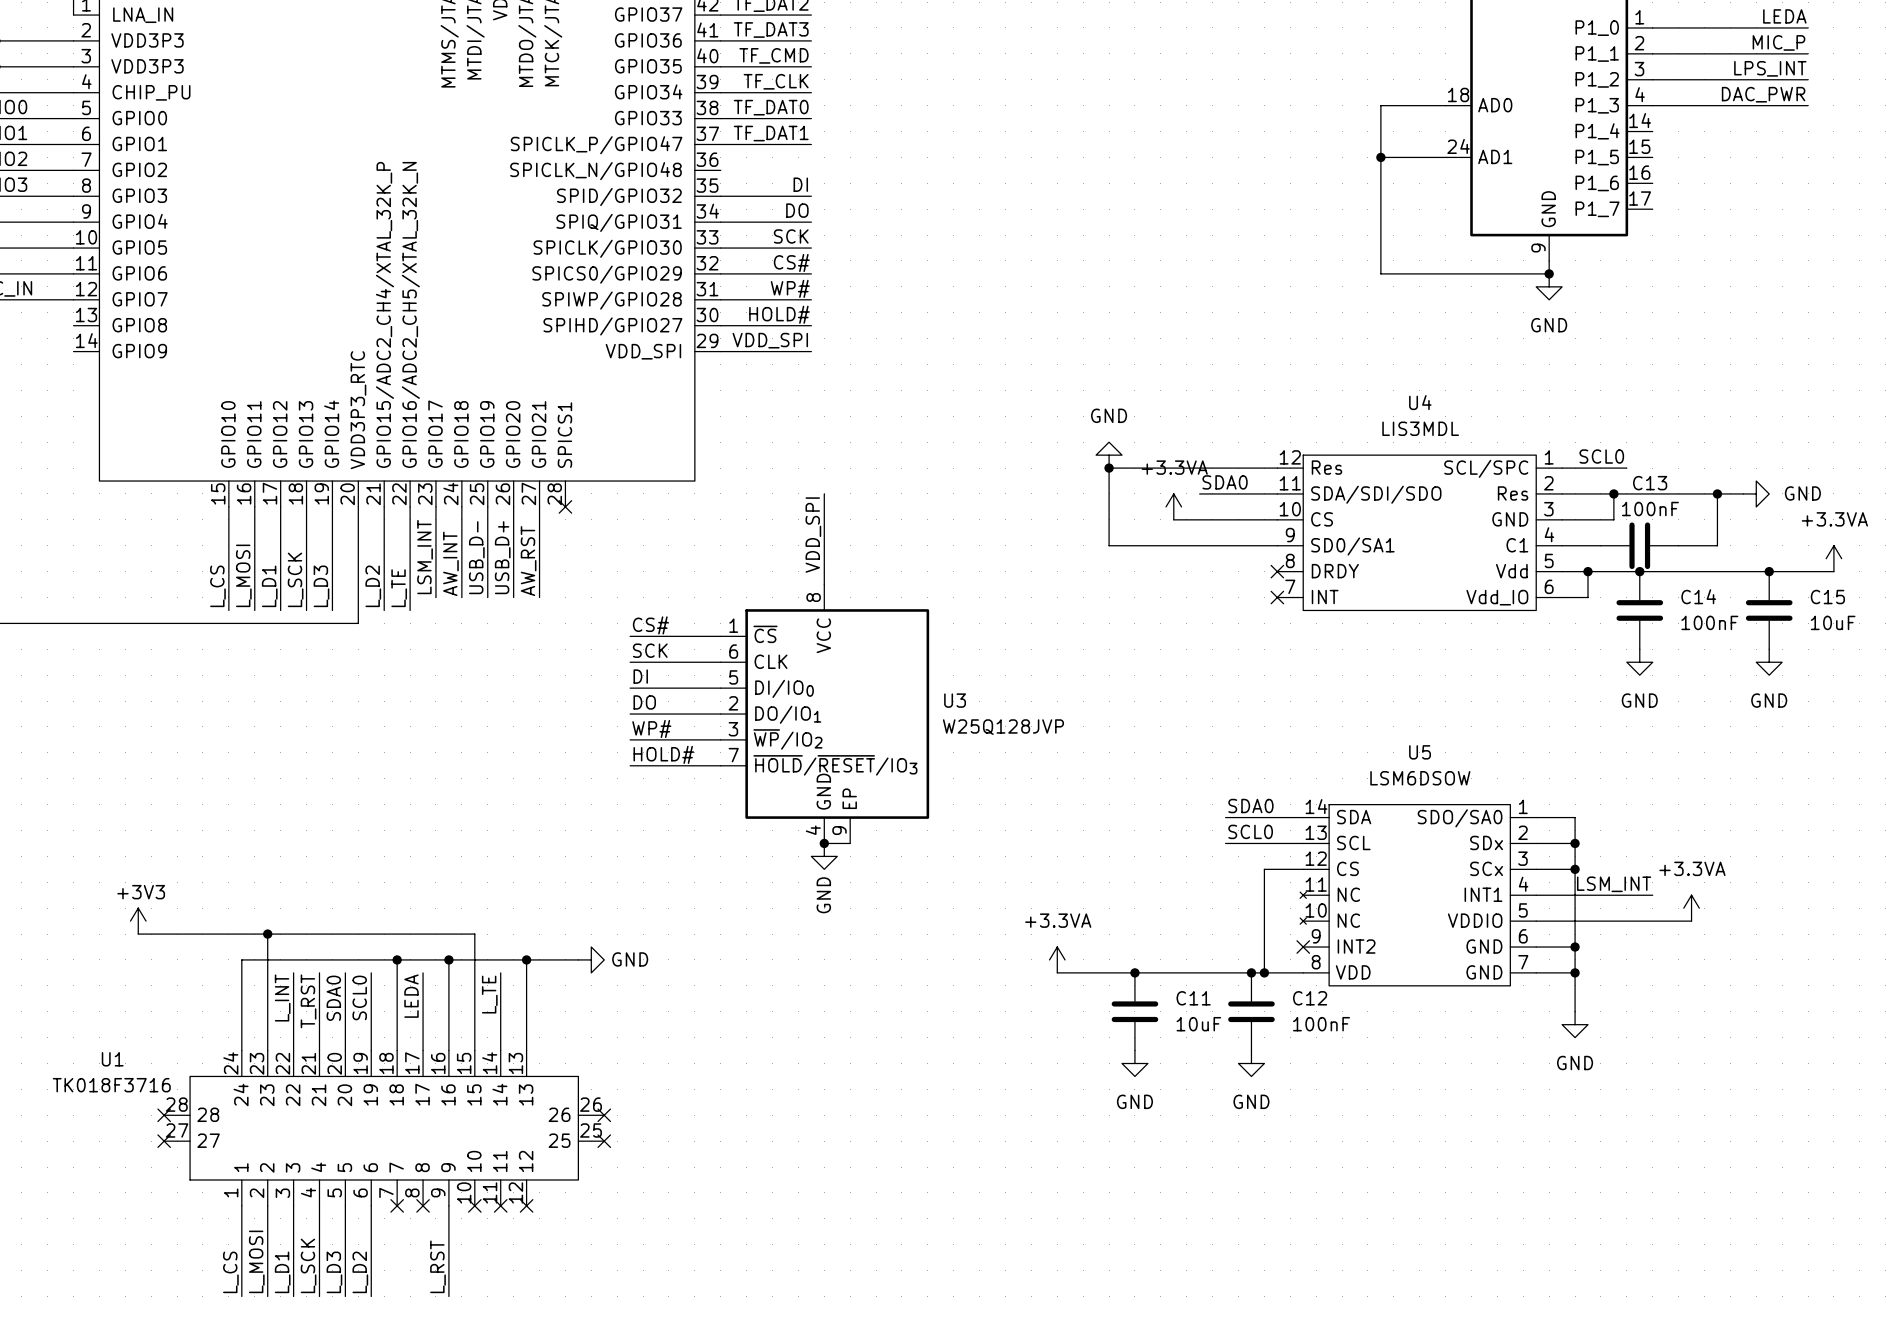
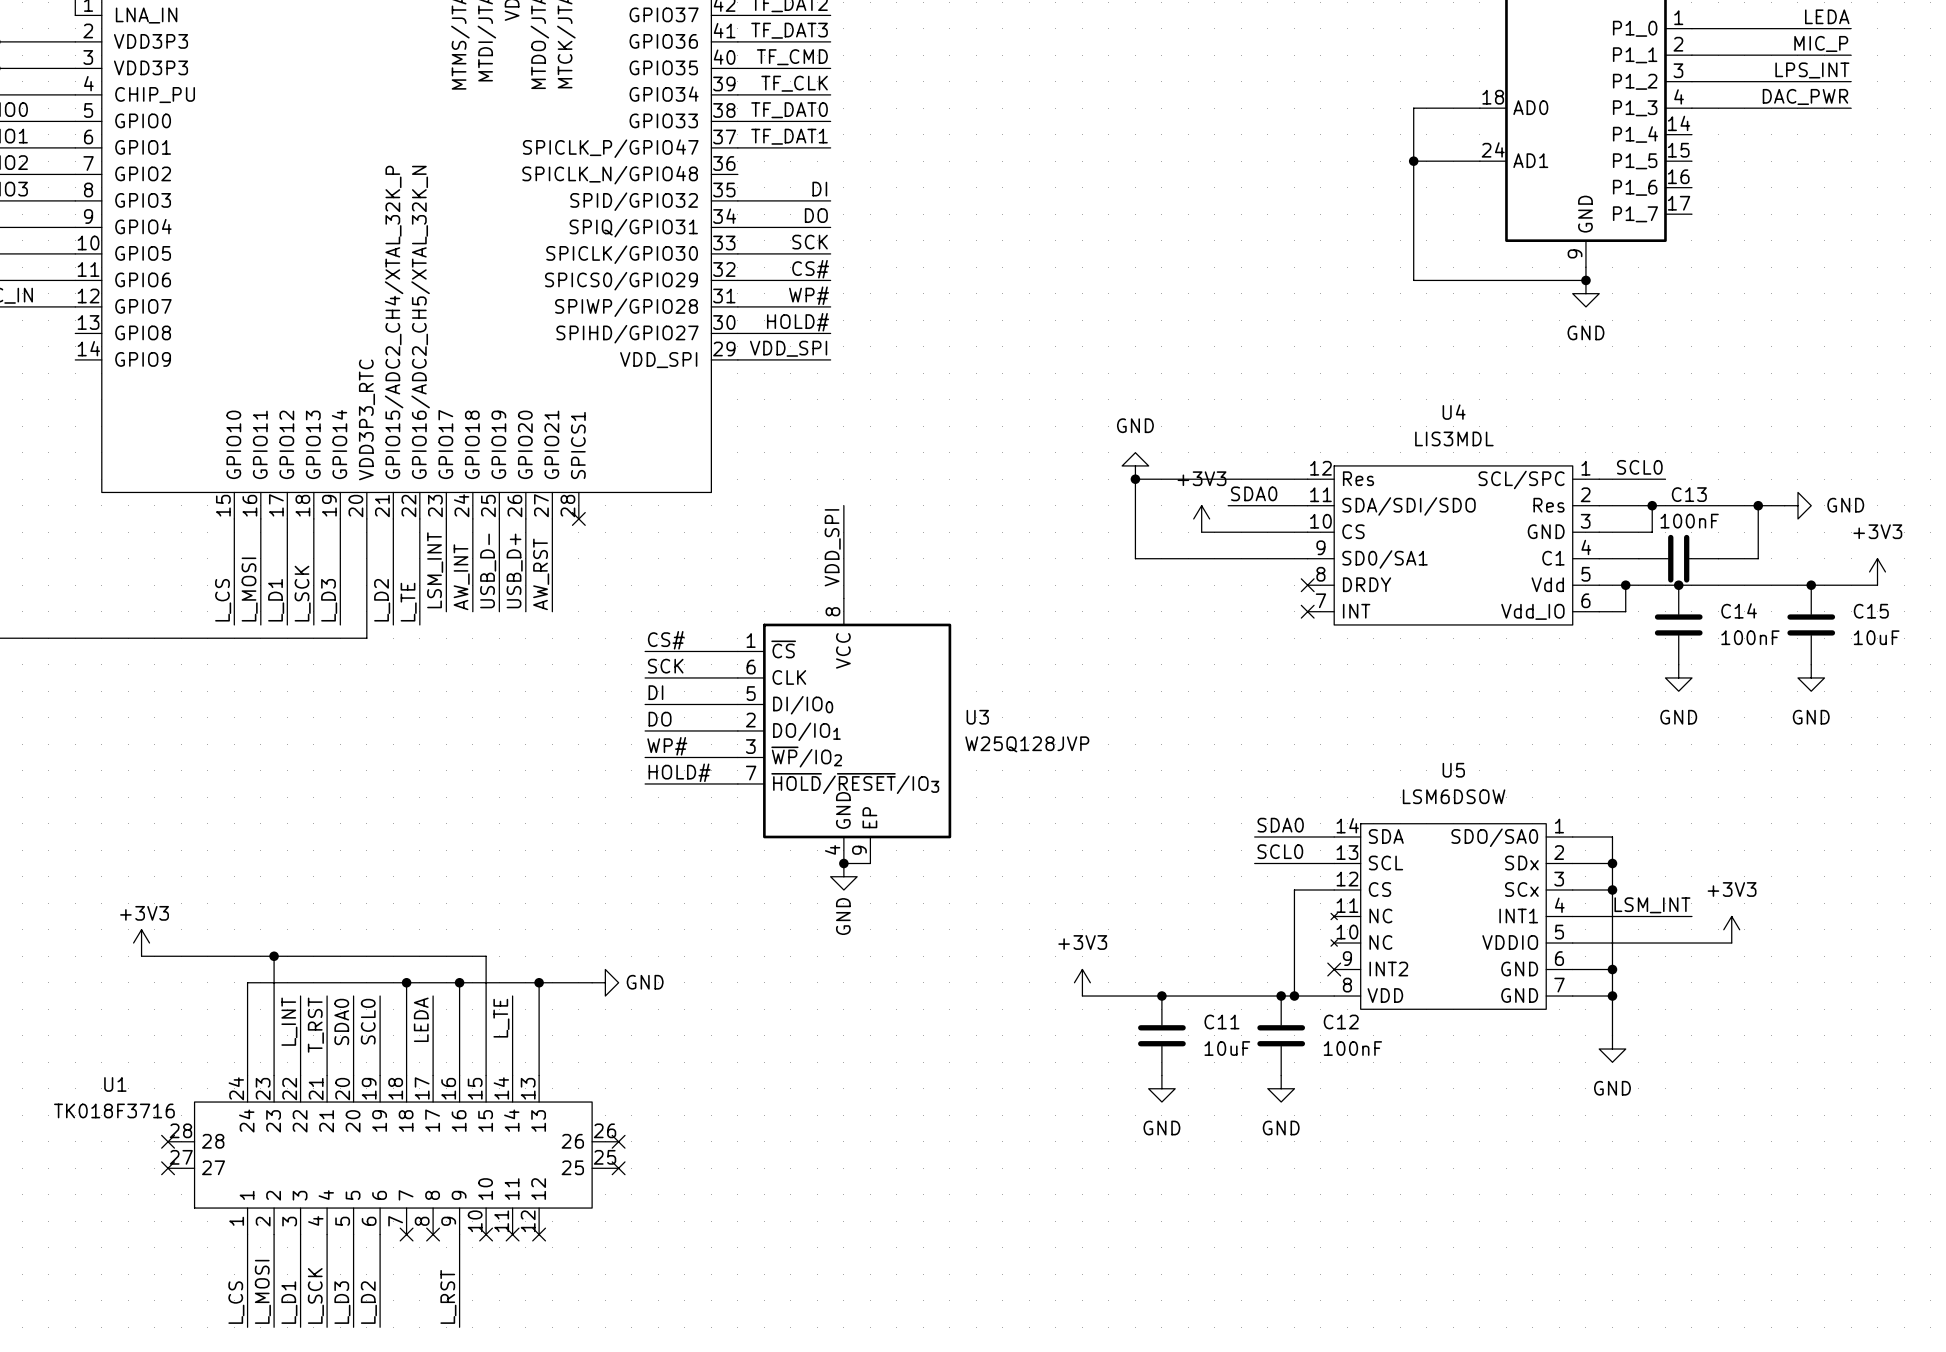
power symbol: +3.3VA (1173, 506) -> +3V3 (1201, 518)
power symbol: +3.3VA (1833, 558) -> +3V3 (1877, 571)
power symbol: +3.3VA (1691, 908) -> +3V3 (1731, 929)
power symbol: +3.3VA (1057, 959) -> +3V3 (1082, 982)

